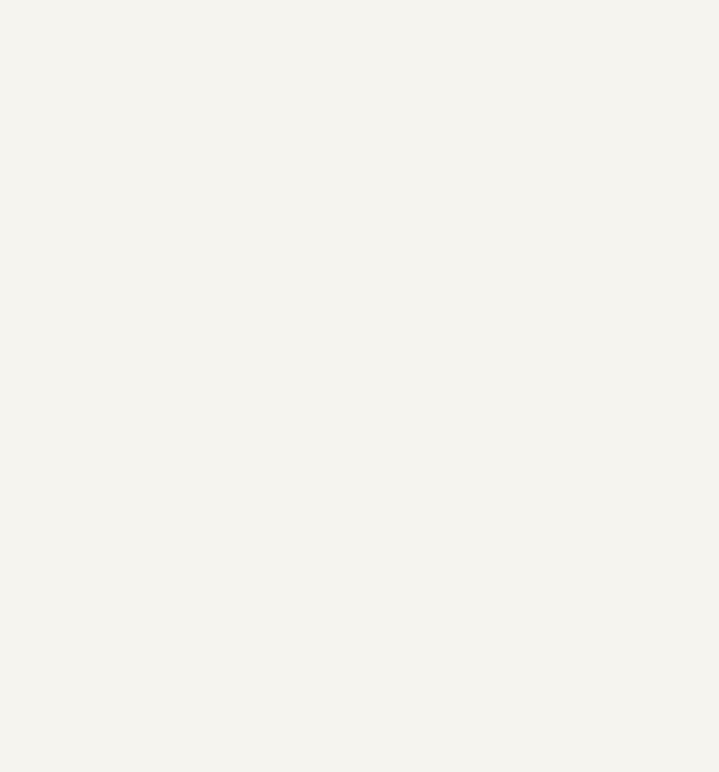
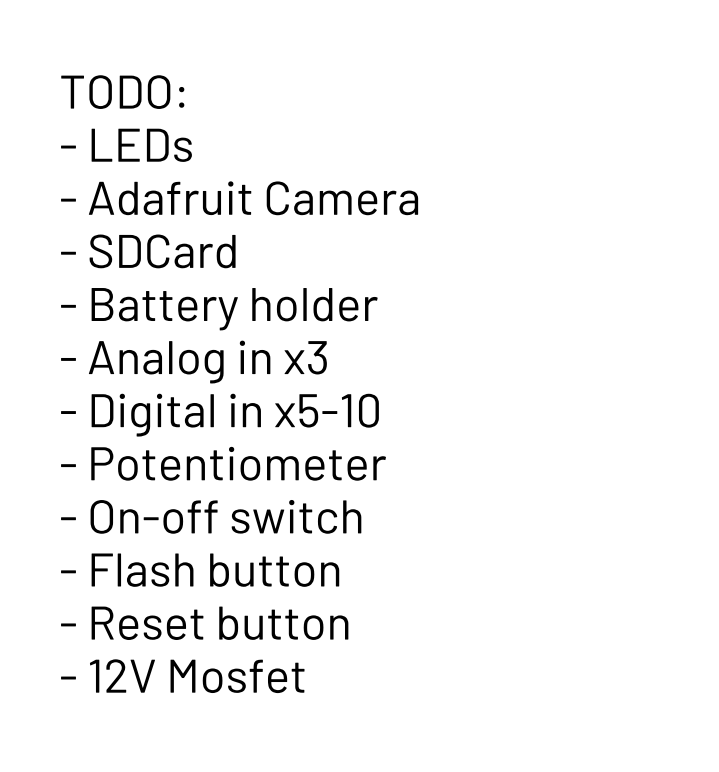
text: none -> TODO: (122, 92)
text: none -> - LEDs (126, 145)
text: none -> - Adafruit Camera (239, 198)
text: none -> - SDCard (148, 251)
text: none -> - Battery holder (219, 309)
text: none -> - Analog in x3 (193, 362)
text: none -> - Digital in x5-10 (219, 415)
text: none -> - Potentiometer (223, 463)
text: none -> - On-off switch (211, 516)
text: none -> - Flash button (200, 570)
text: none -> - Reset button (204, 623)
text: none -> - 12V Mosfet (182, 676)

